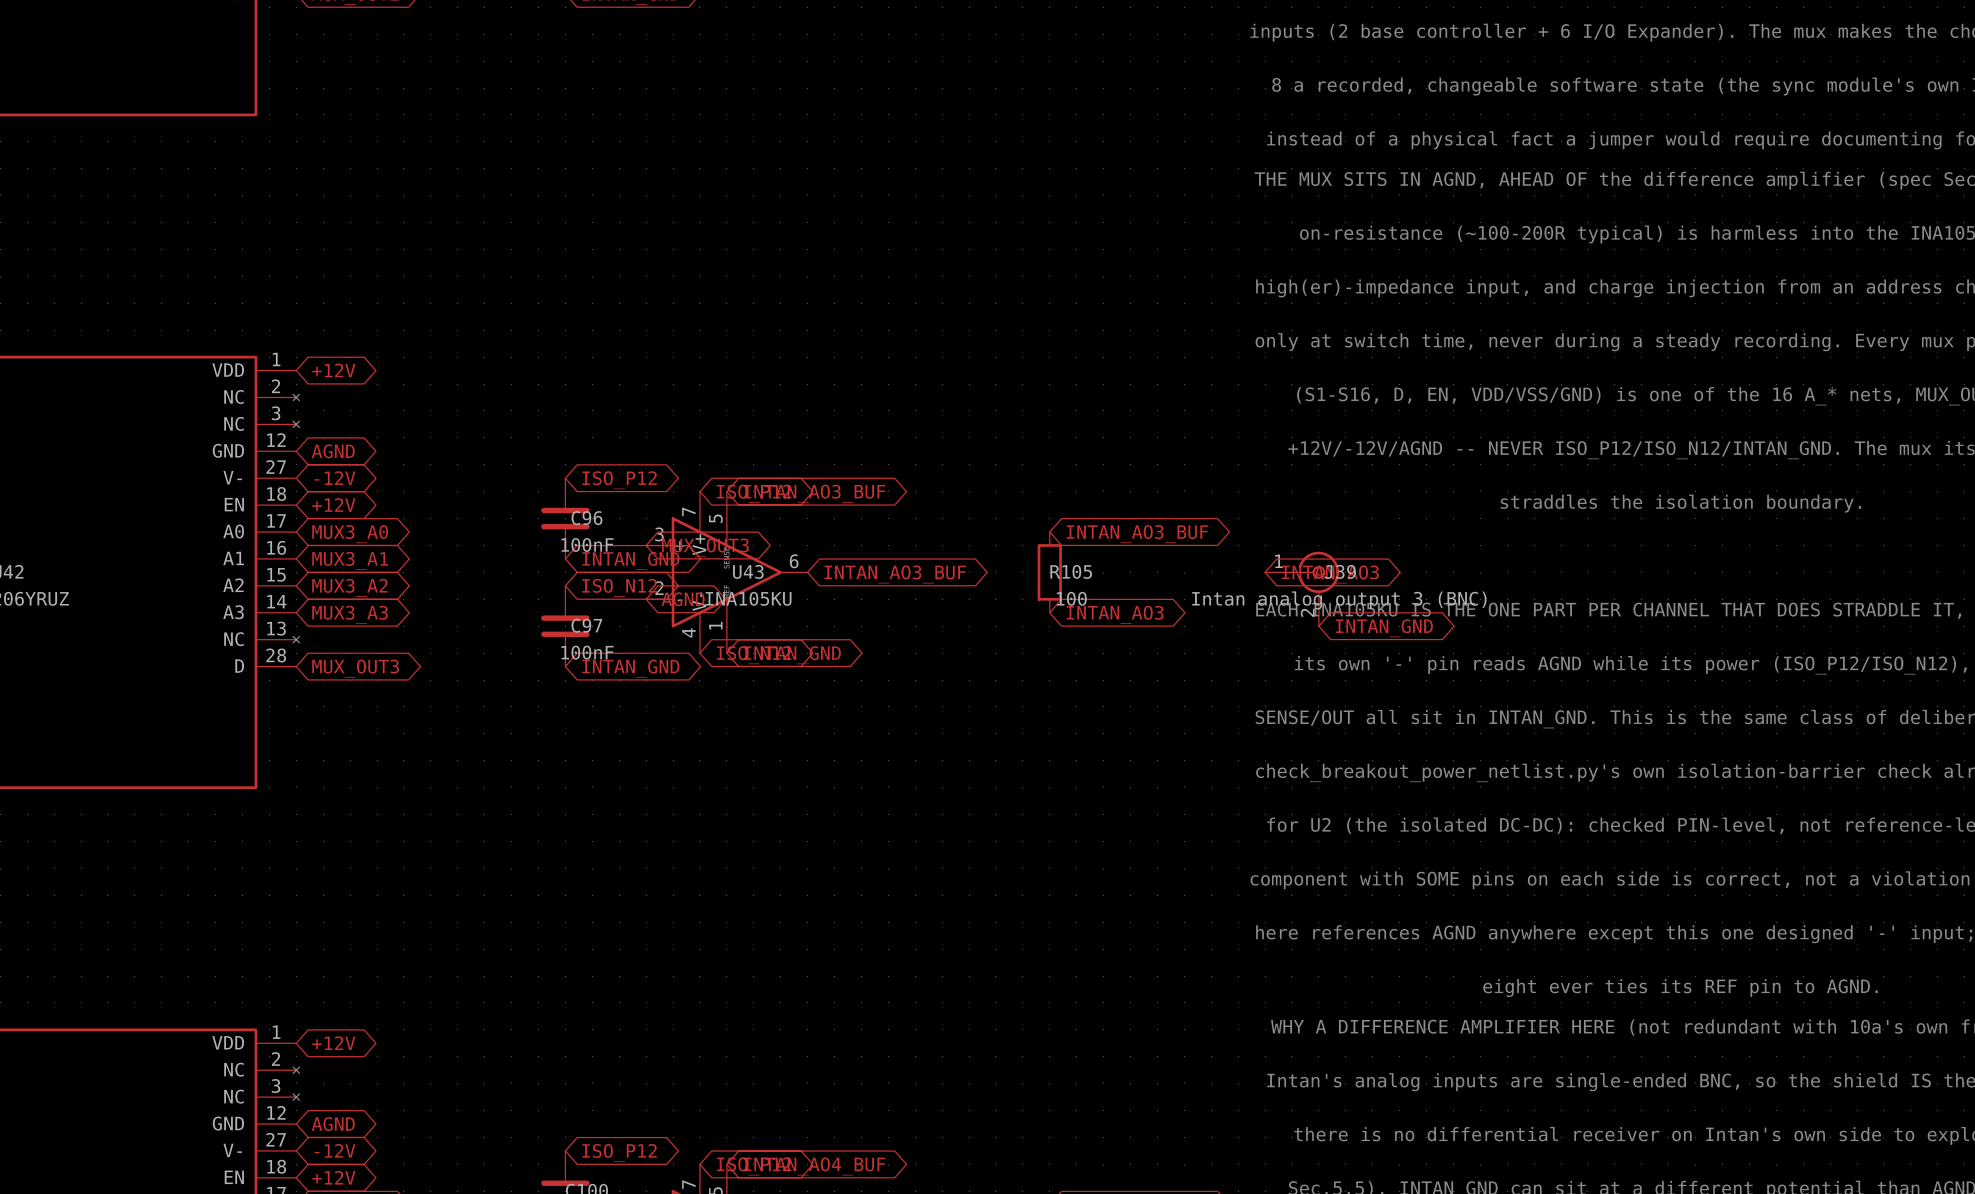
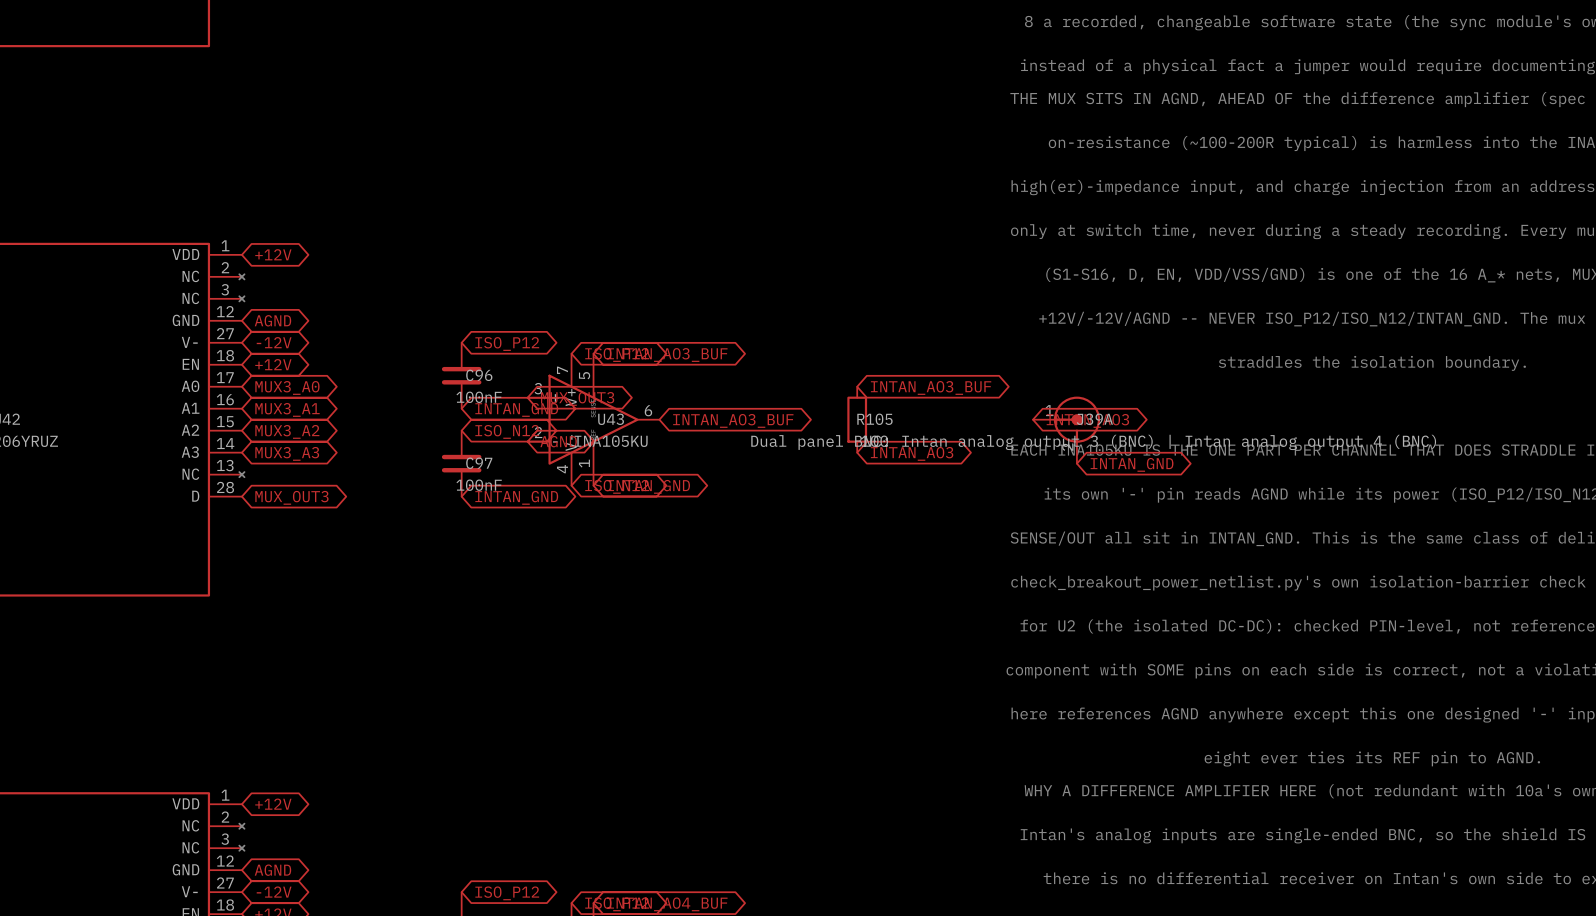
J39A: none -> Dual panel BNC: Intan analog output 3 (BNC) | Intan analog output 4 (BNC) (1066, 430)
J39: Intan analog output 3 (BNC) (1302, 588) -> none

